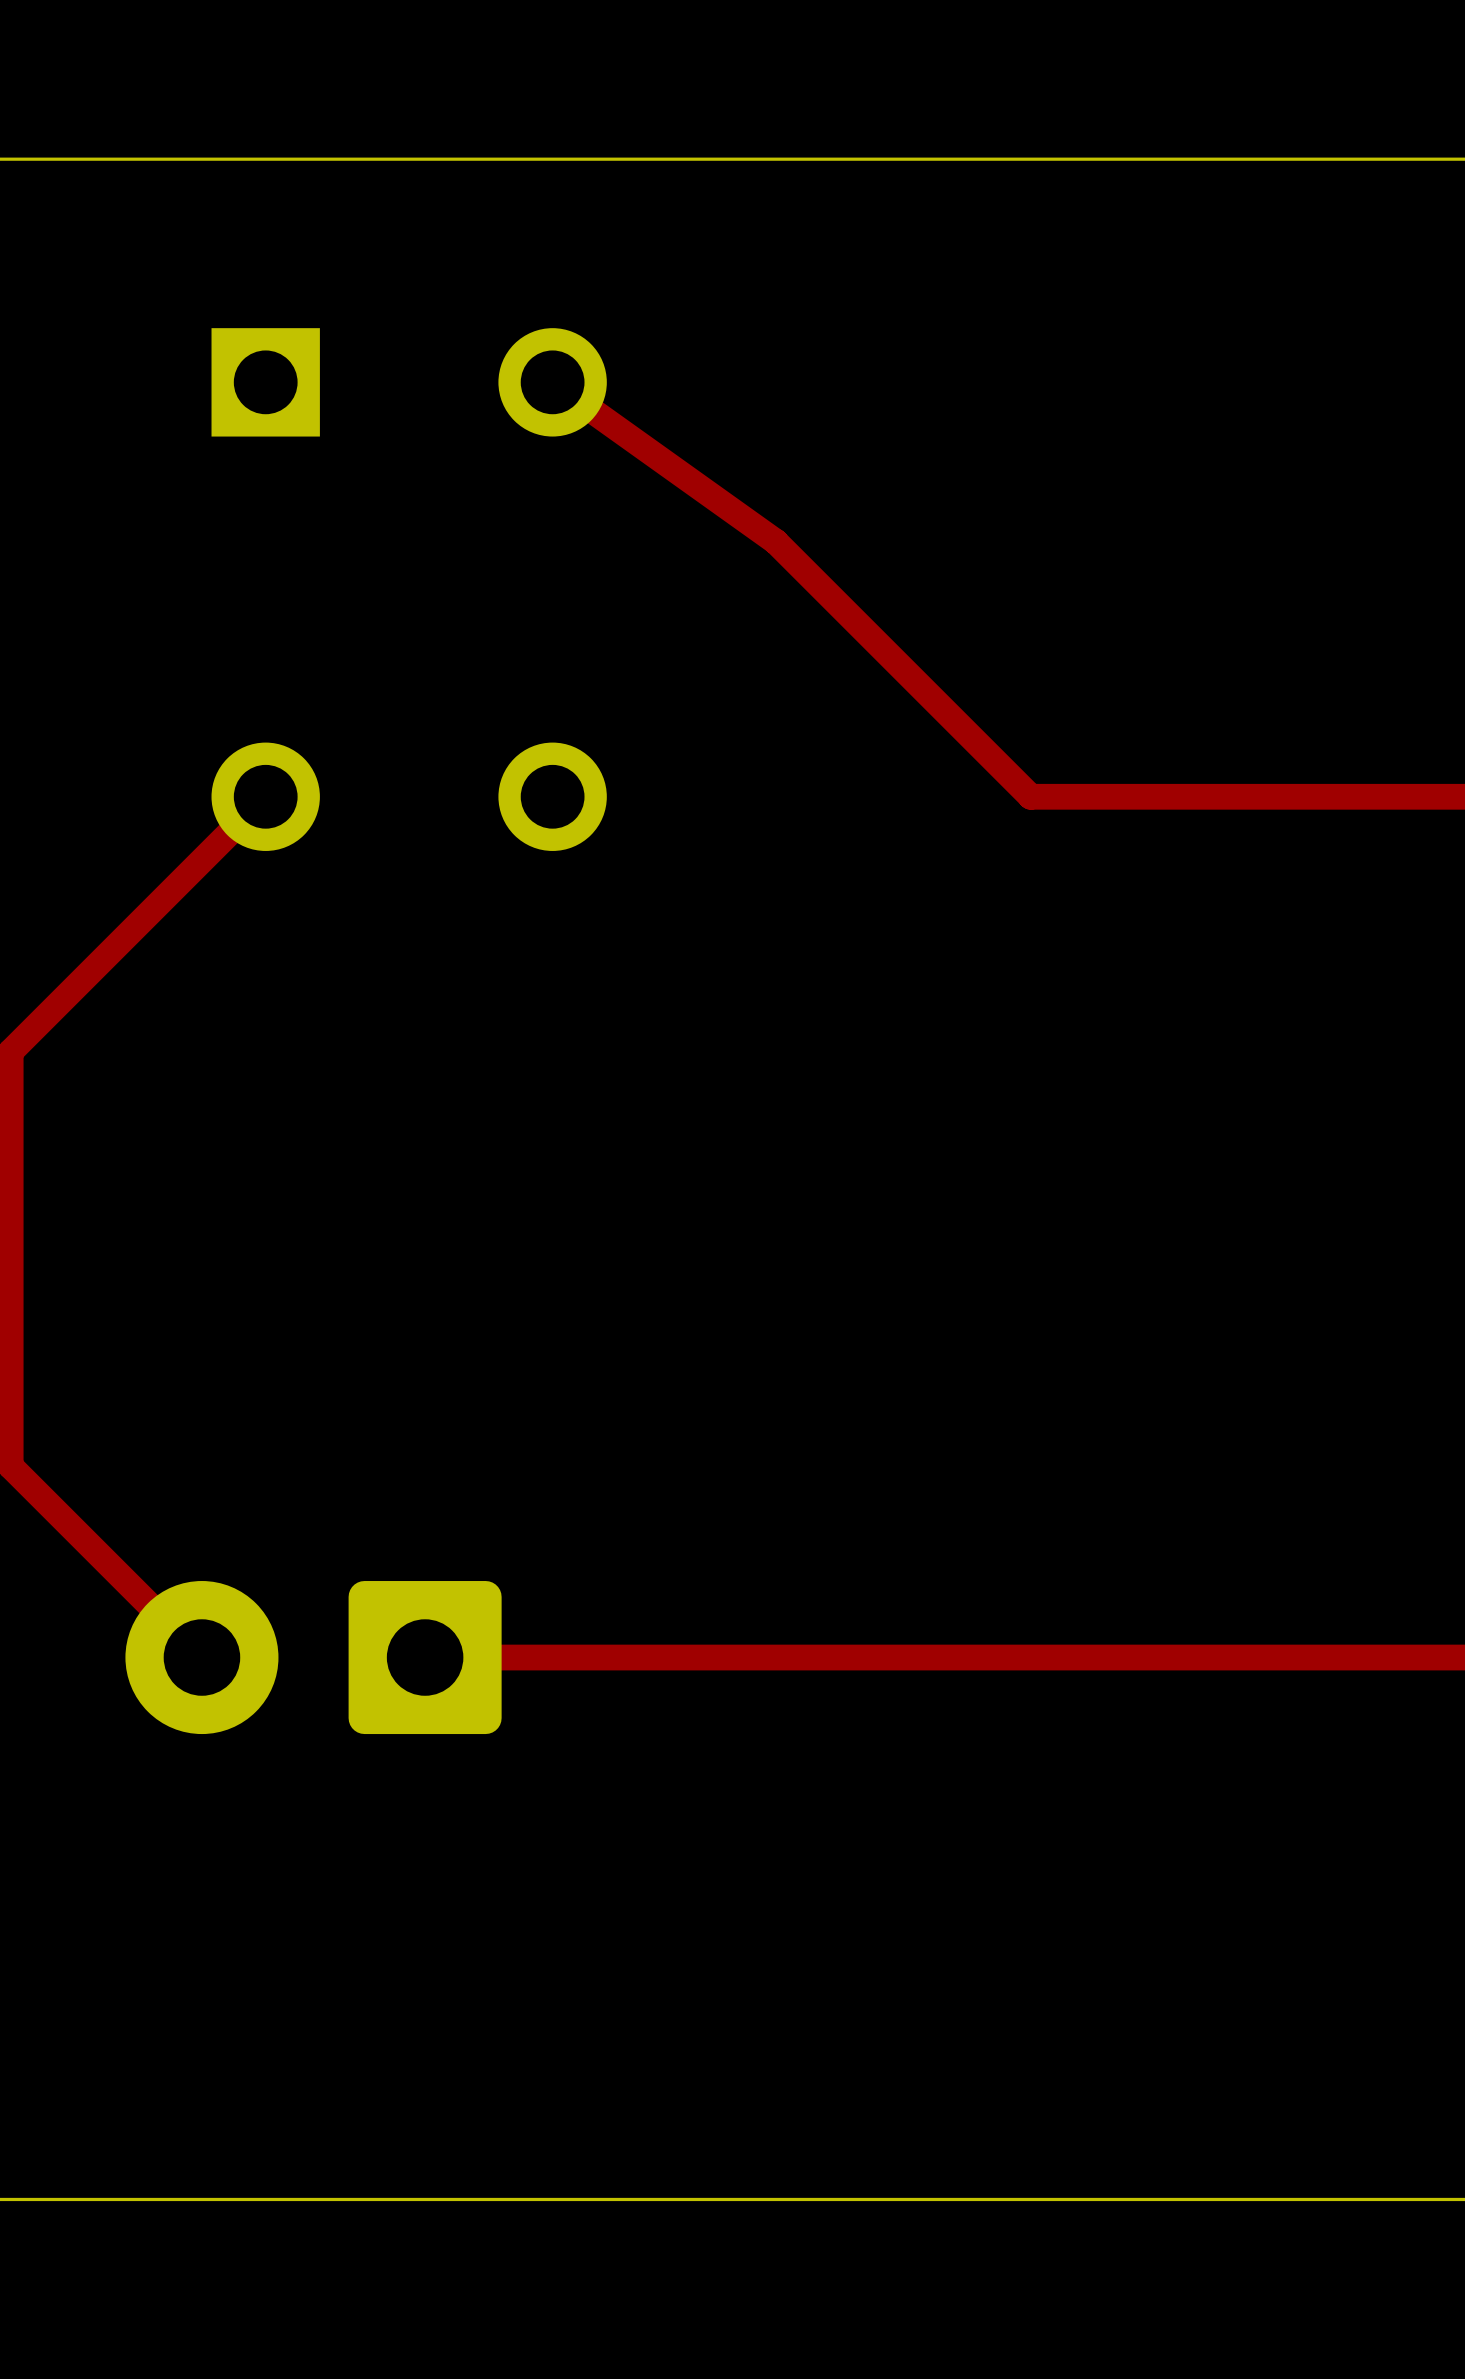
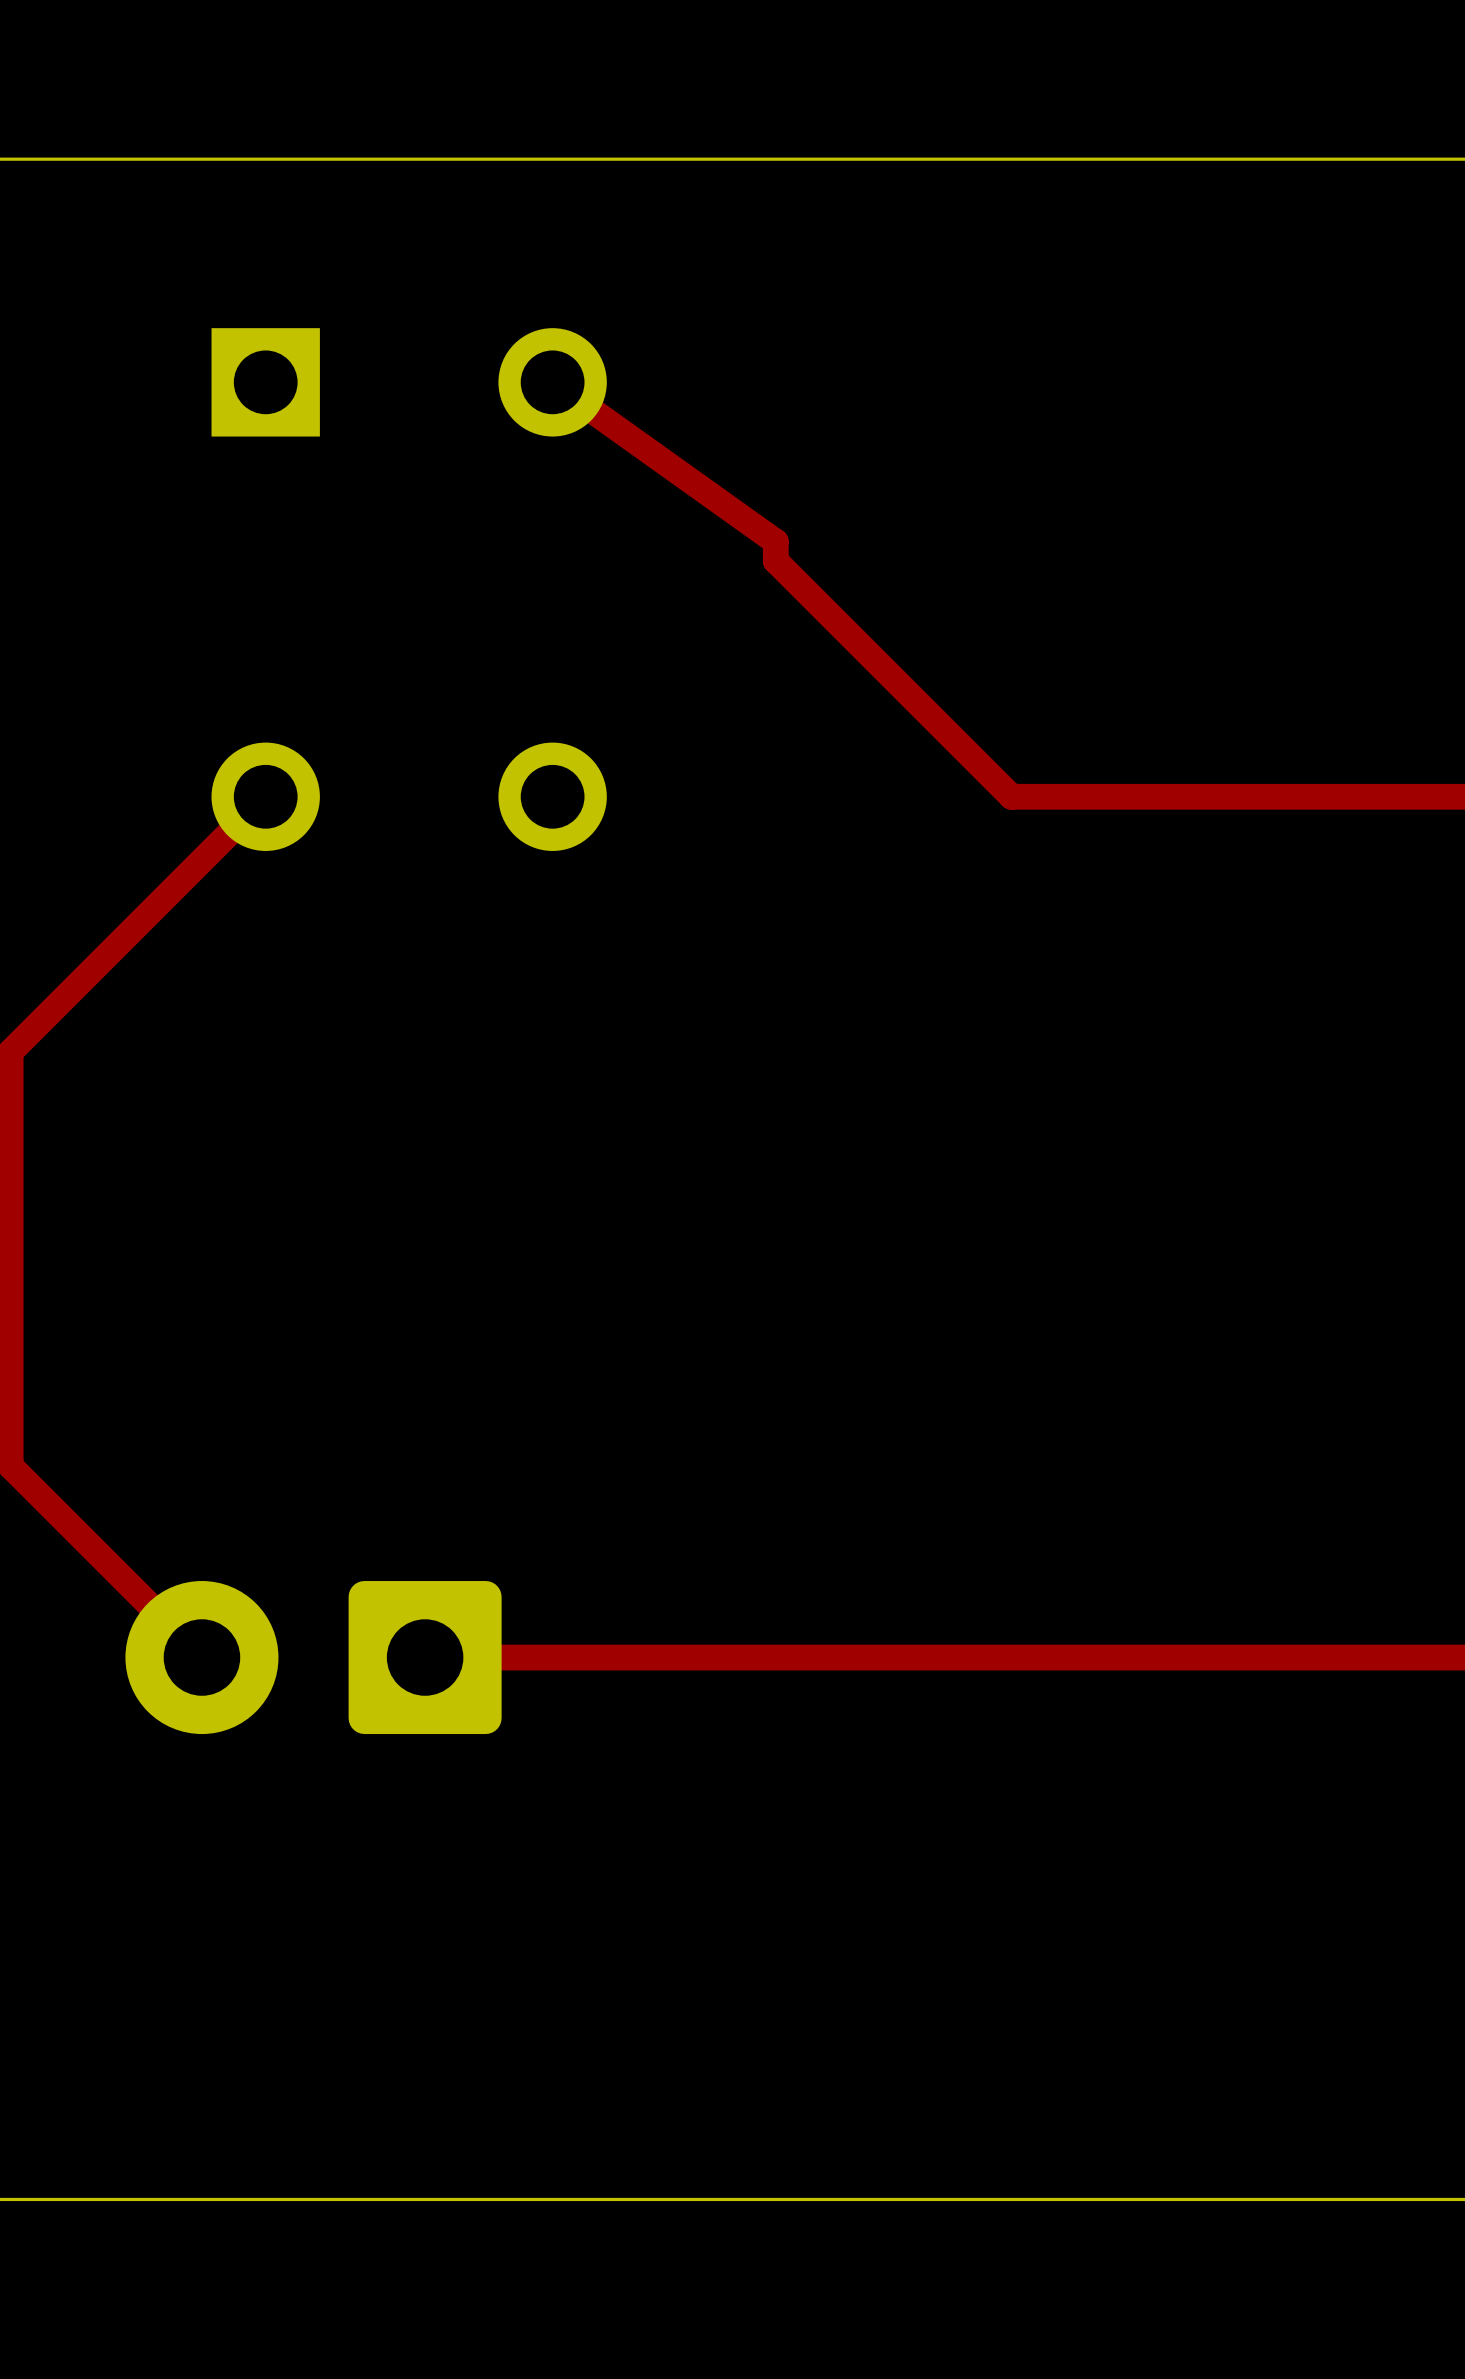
top track: (775, 541) (1030, 796) -> (775, 541) (775, 560) (1011, 796) (1030, 796)

